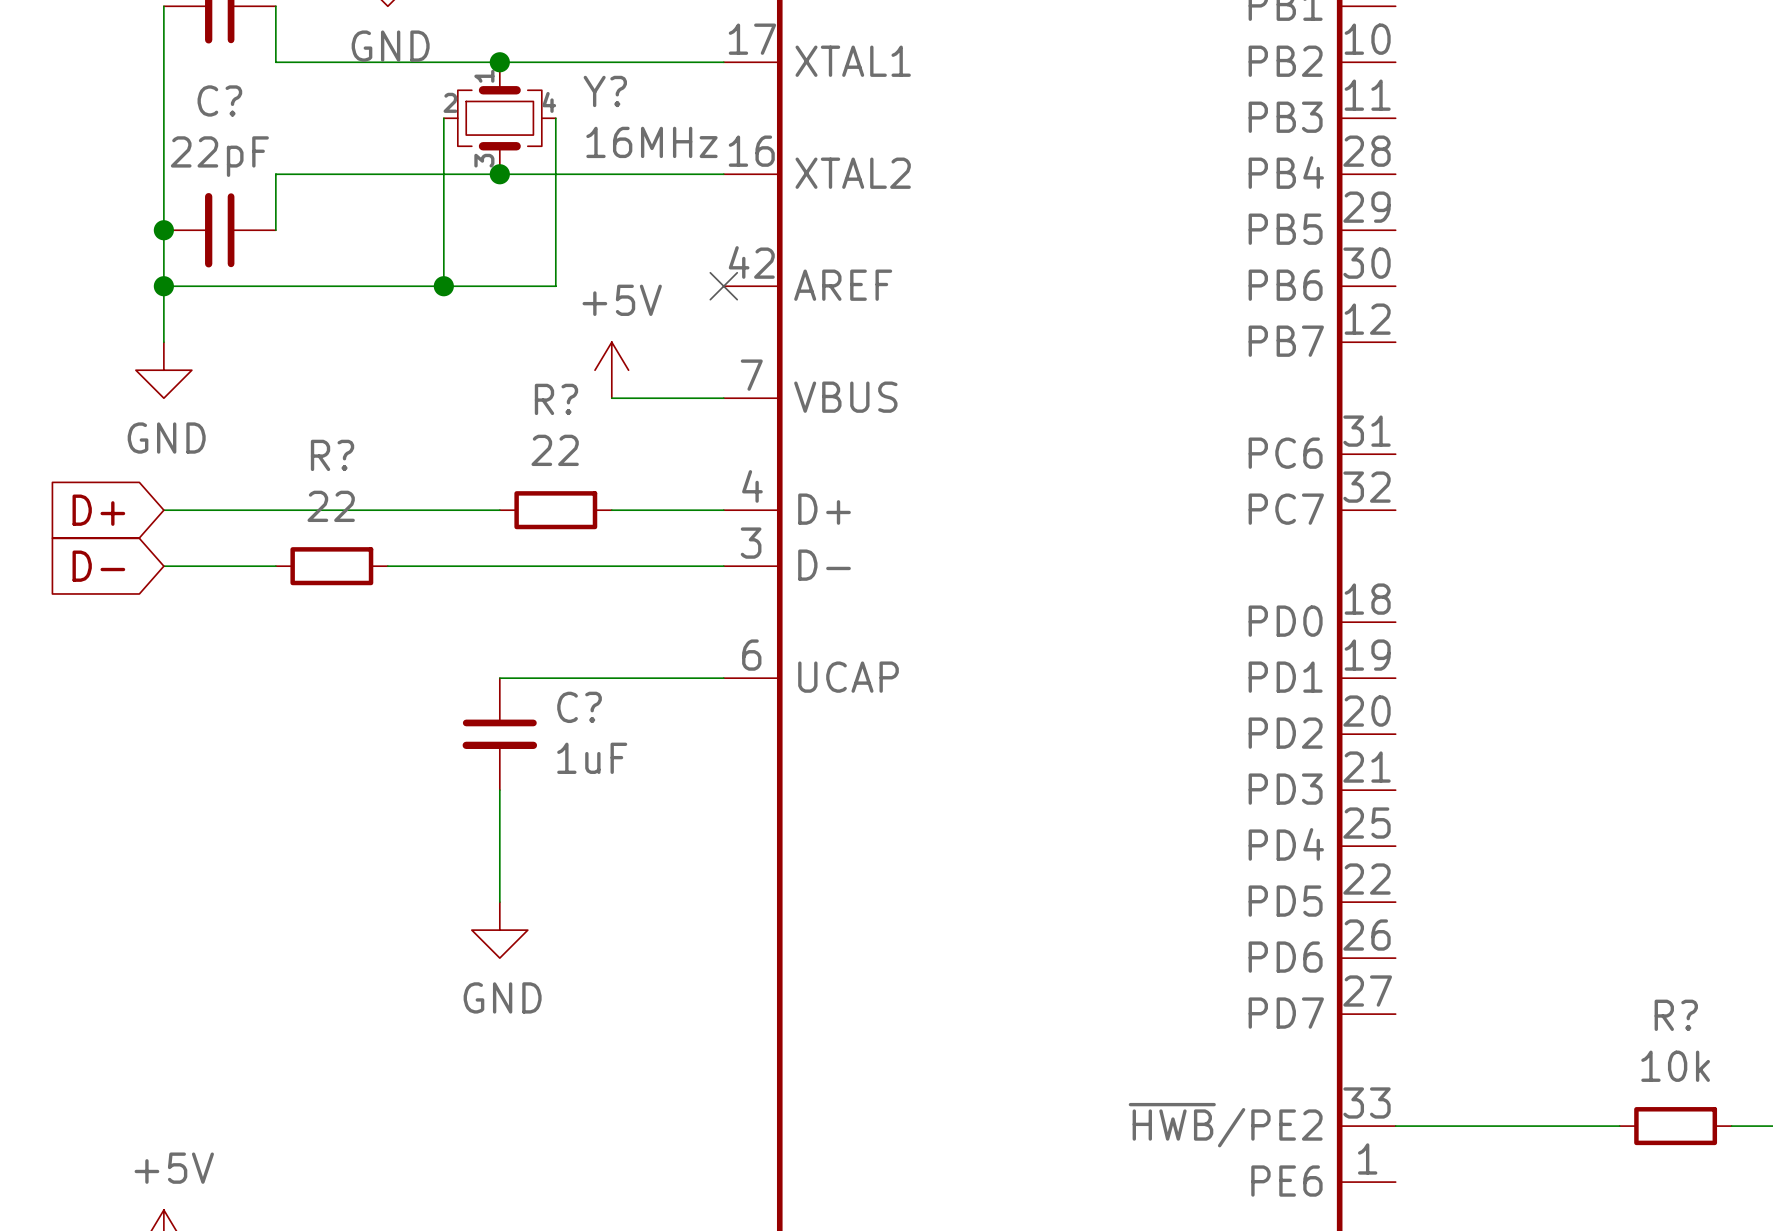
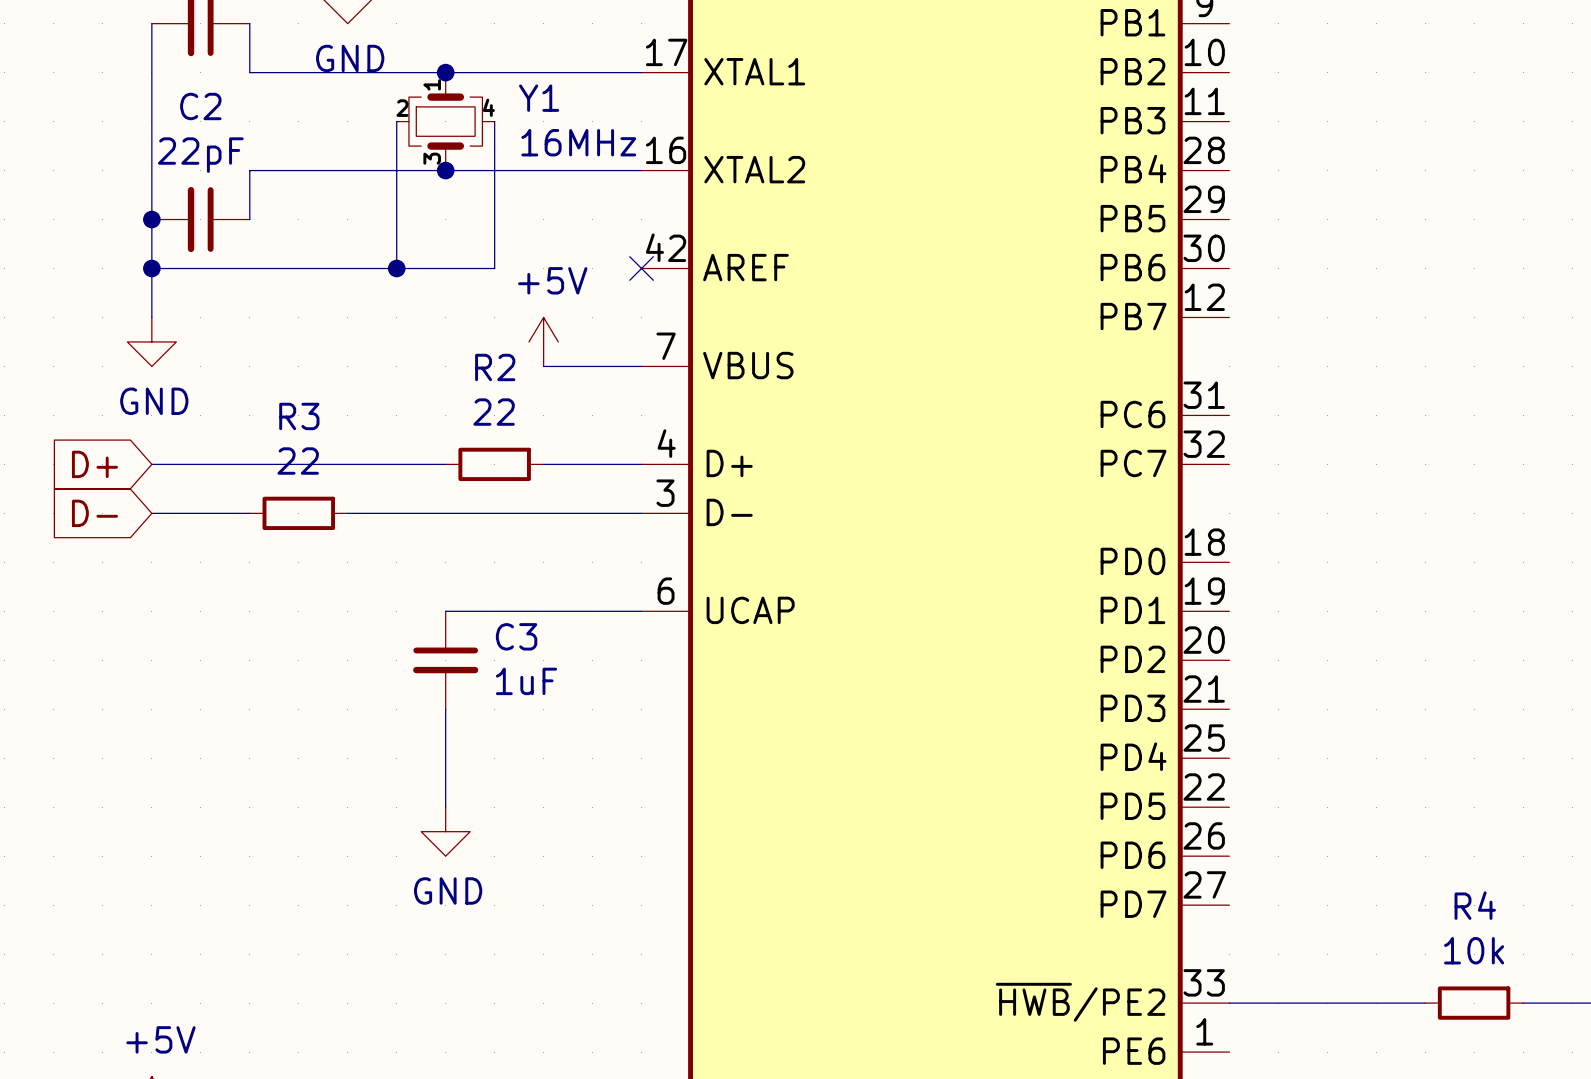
Y? name: Y? (605, 91) -> Y1 (539, 98)
C? name: C? (219, 100) -> C2 (200, 106)
R? name: R? (556, 399) -> R2 (495, 367)
R? name: R? (332, 455) -> R3 (299, 416)
C? name: C? (579, 707) -> C3 (516, 636)
R? name: R? (1676, 1015) -> R4 (1475, 905)

